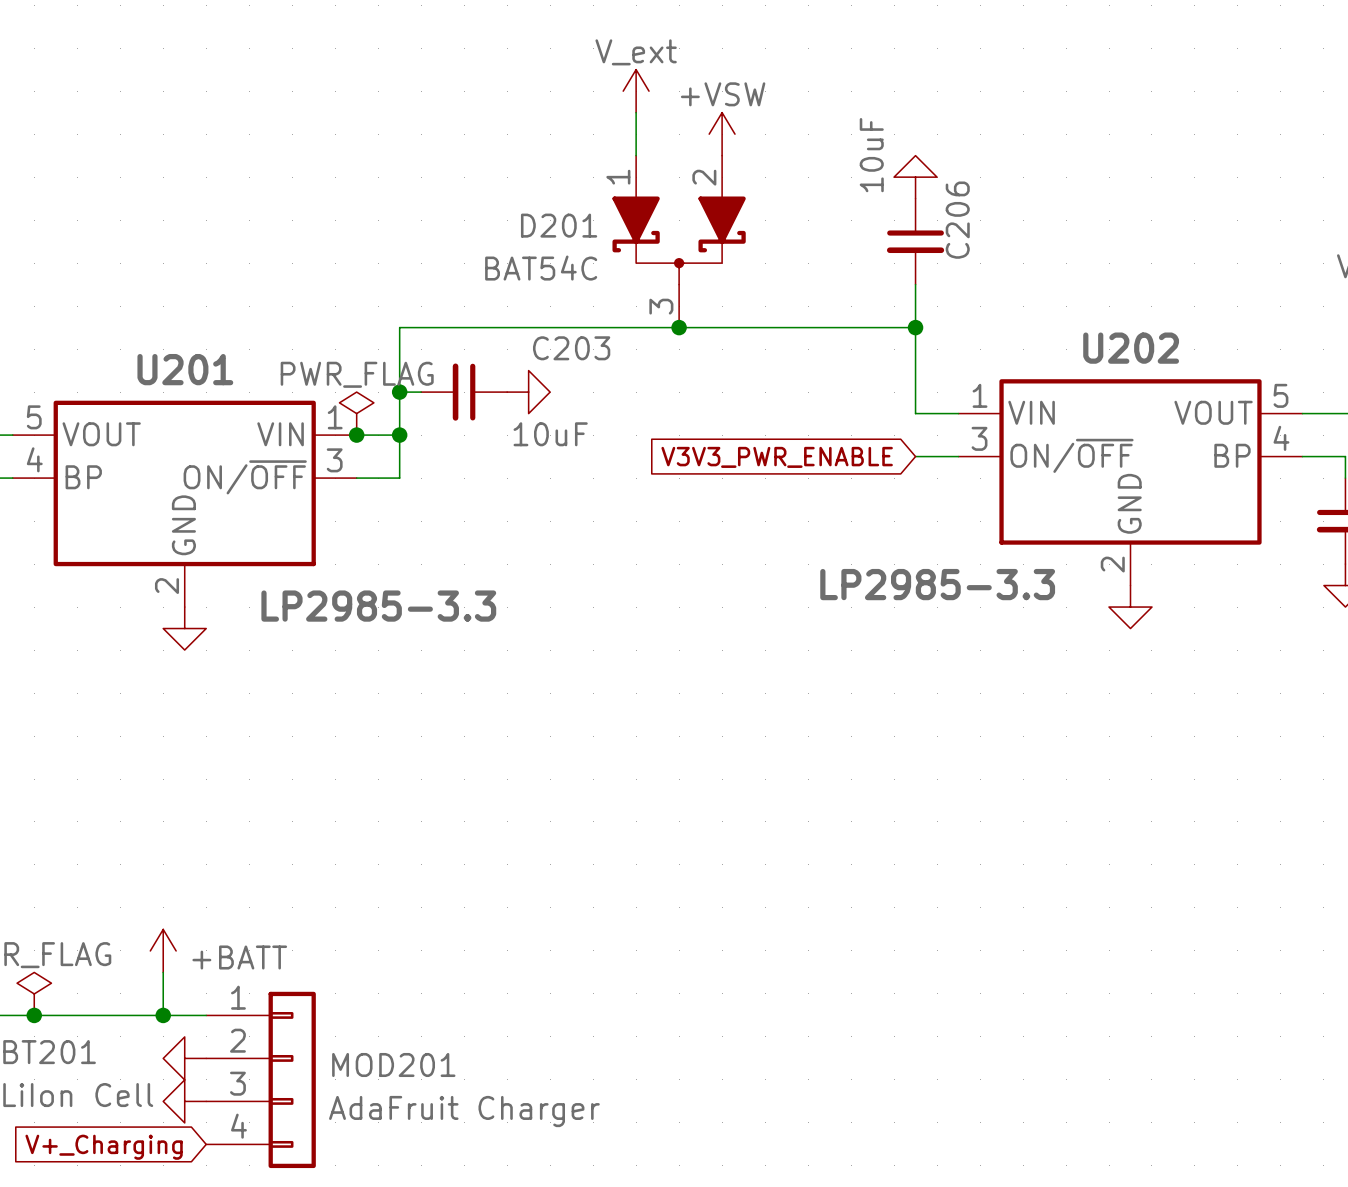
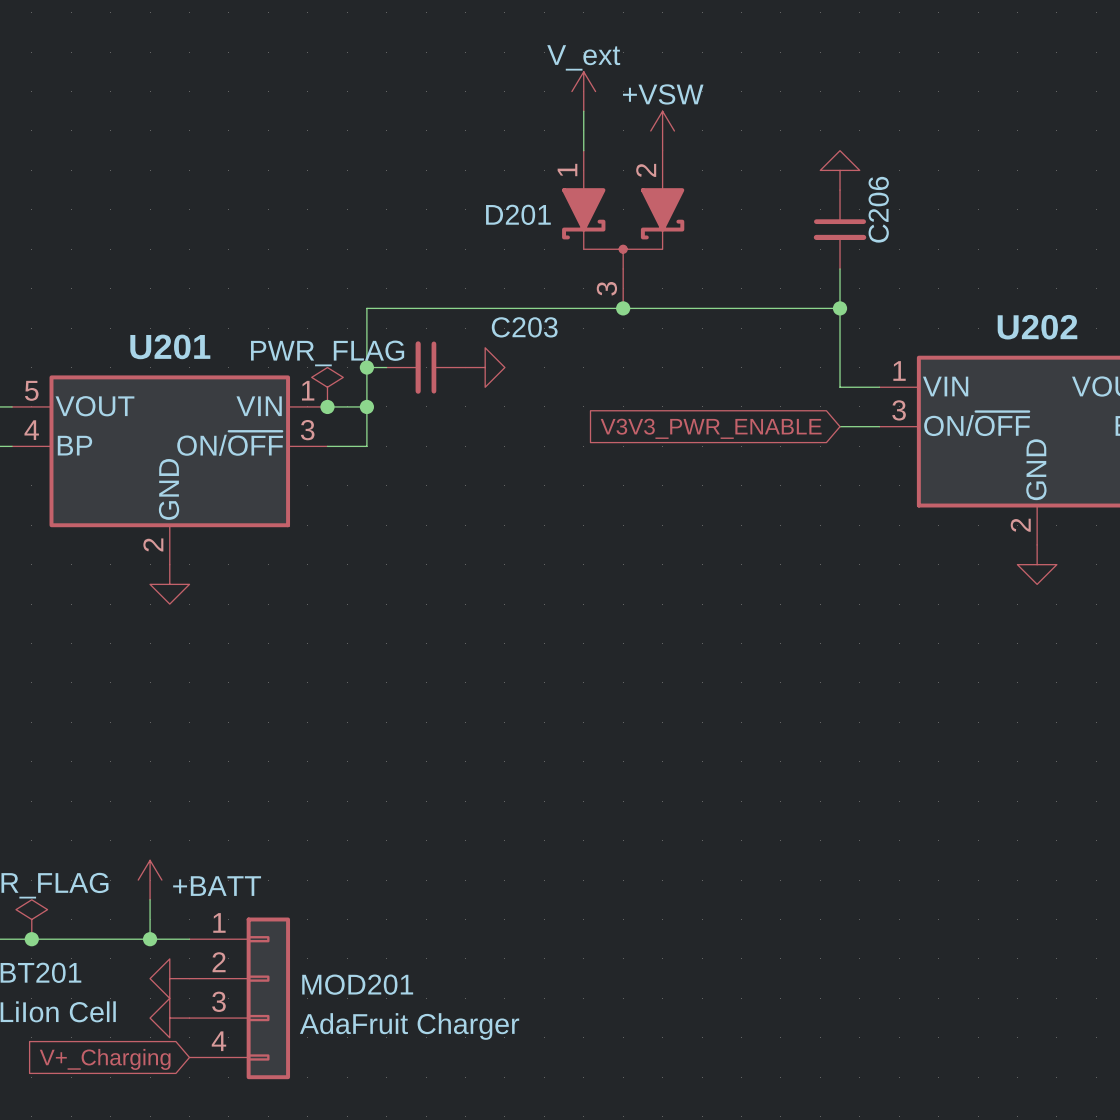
C206 value: 10uF (871, 155) -> none
D201 value: BAT54C (541, 268) -> none
C203 value: 10uF (550, 434) -> none
U202 value: LP2985-3.3 (937, 584) -> none
U201 value: LP2985-3.3 (378, 606) -> none

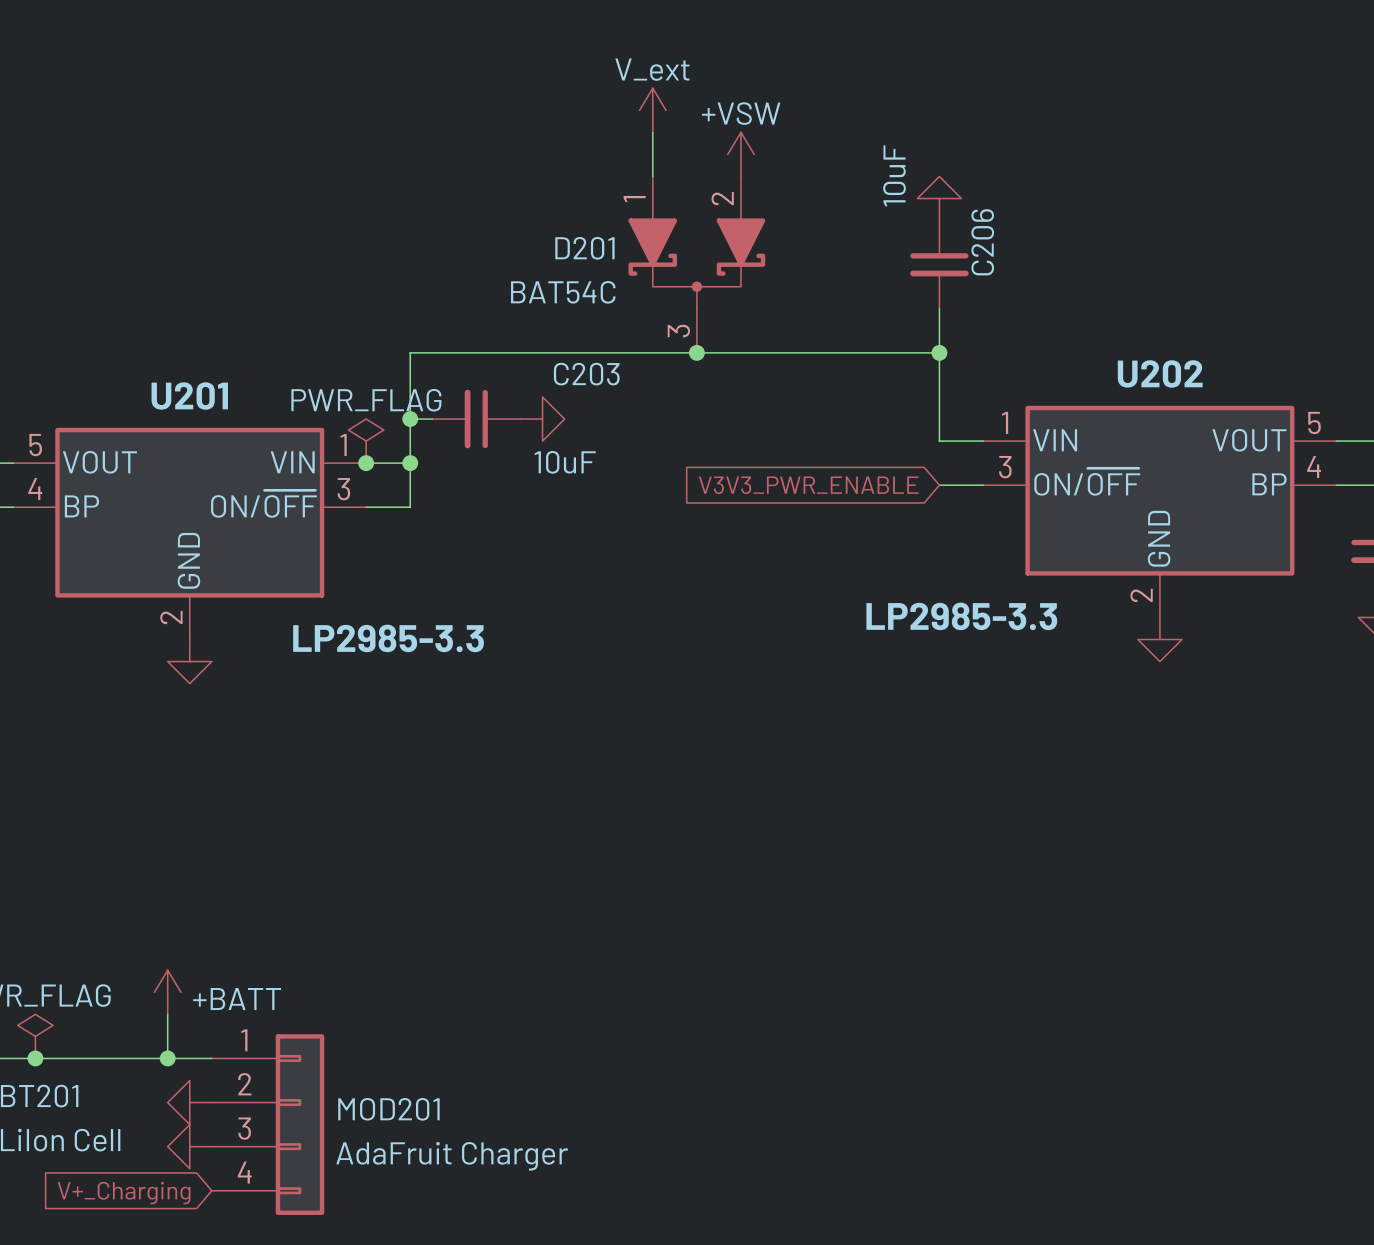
C206 value: none -> 10uF (894, 175)
D201 value: none -> BAT54C (563, 292)
C203 value: none -> 10uF (565, 462)
U202 value: none -> LP2985-3.3 (961, 616)
U201 value: none -> LP2985-3.3 (388, 638)

